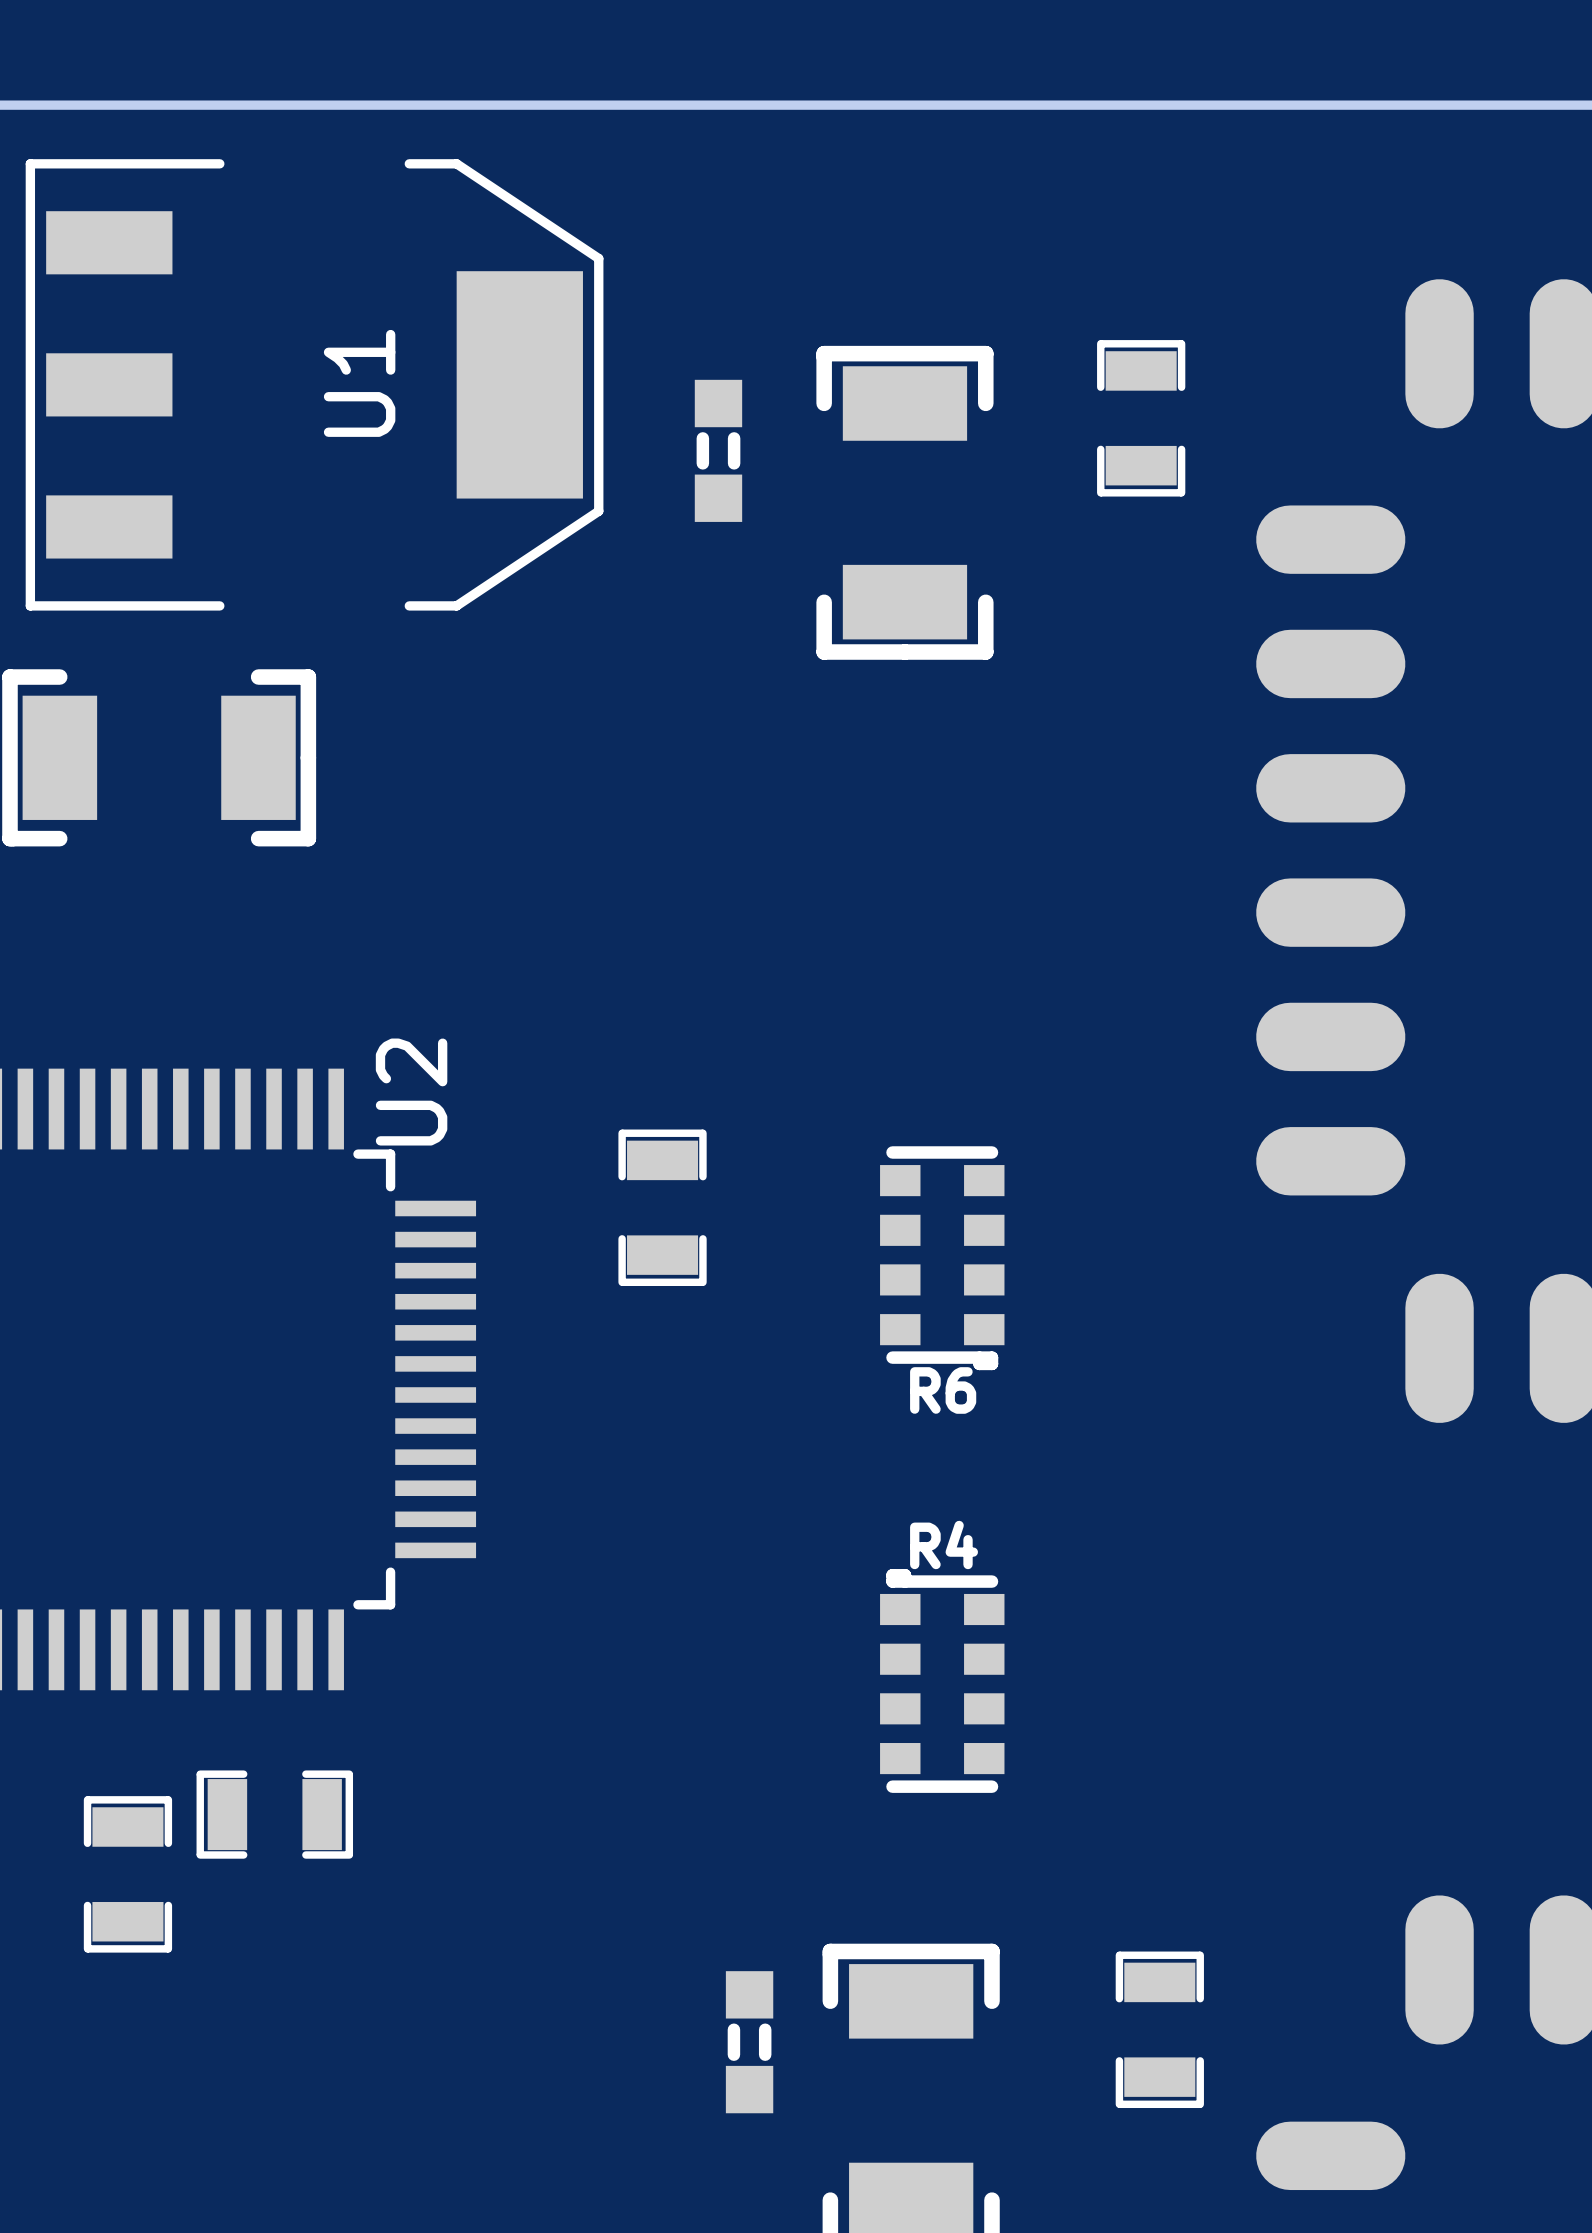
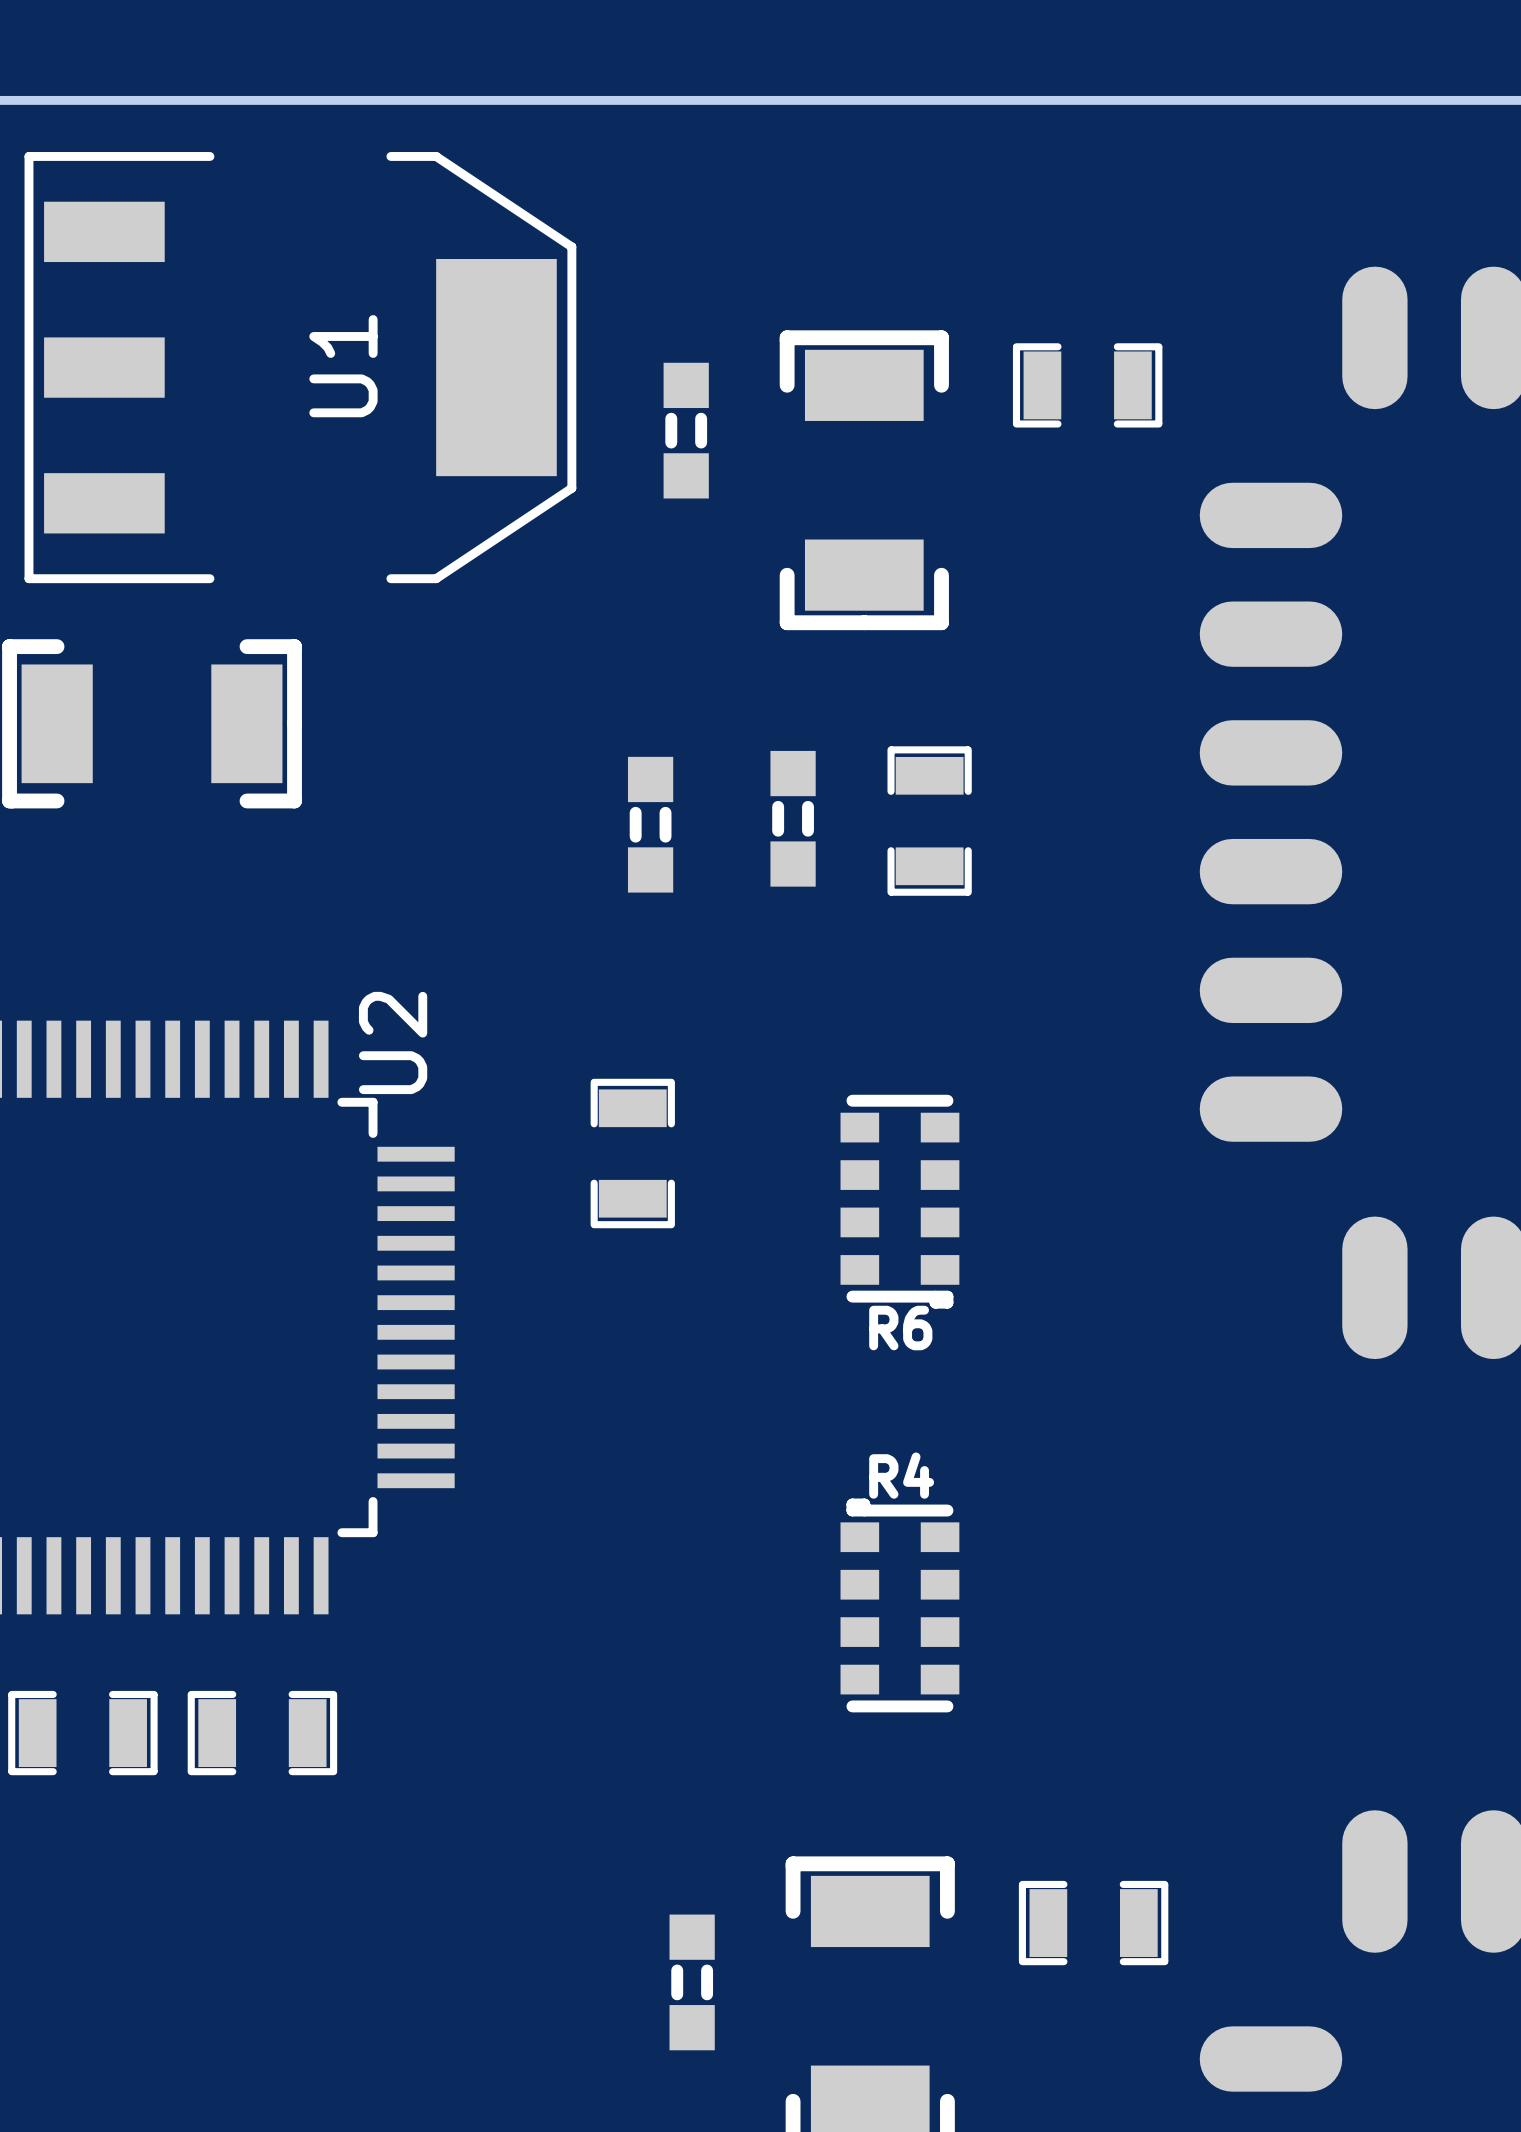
part rotation: 0° (1141, 418) -> 90° clockwise (1087, 385)
part: none -> (793, 818)
part: none -> (929, 821)
part: none -> (650, 824)
part rotation: 0° (127, 1874) -> 90° clockwise (82, 1733)
part rotation: 0° (1159, 2029) -> 90° clockwise (1093, 1923)
part position: (749, 2042) -> (692, 1982)

